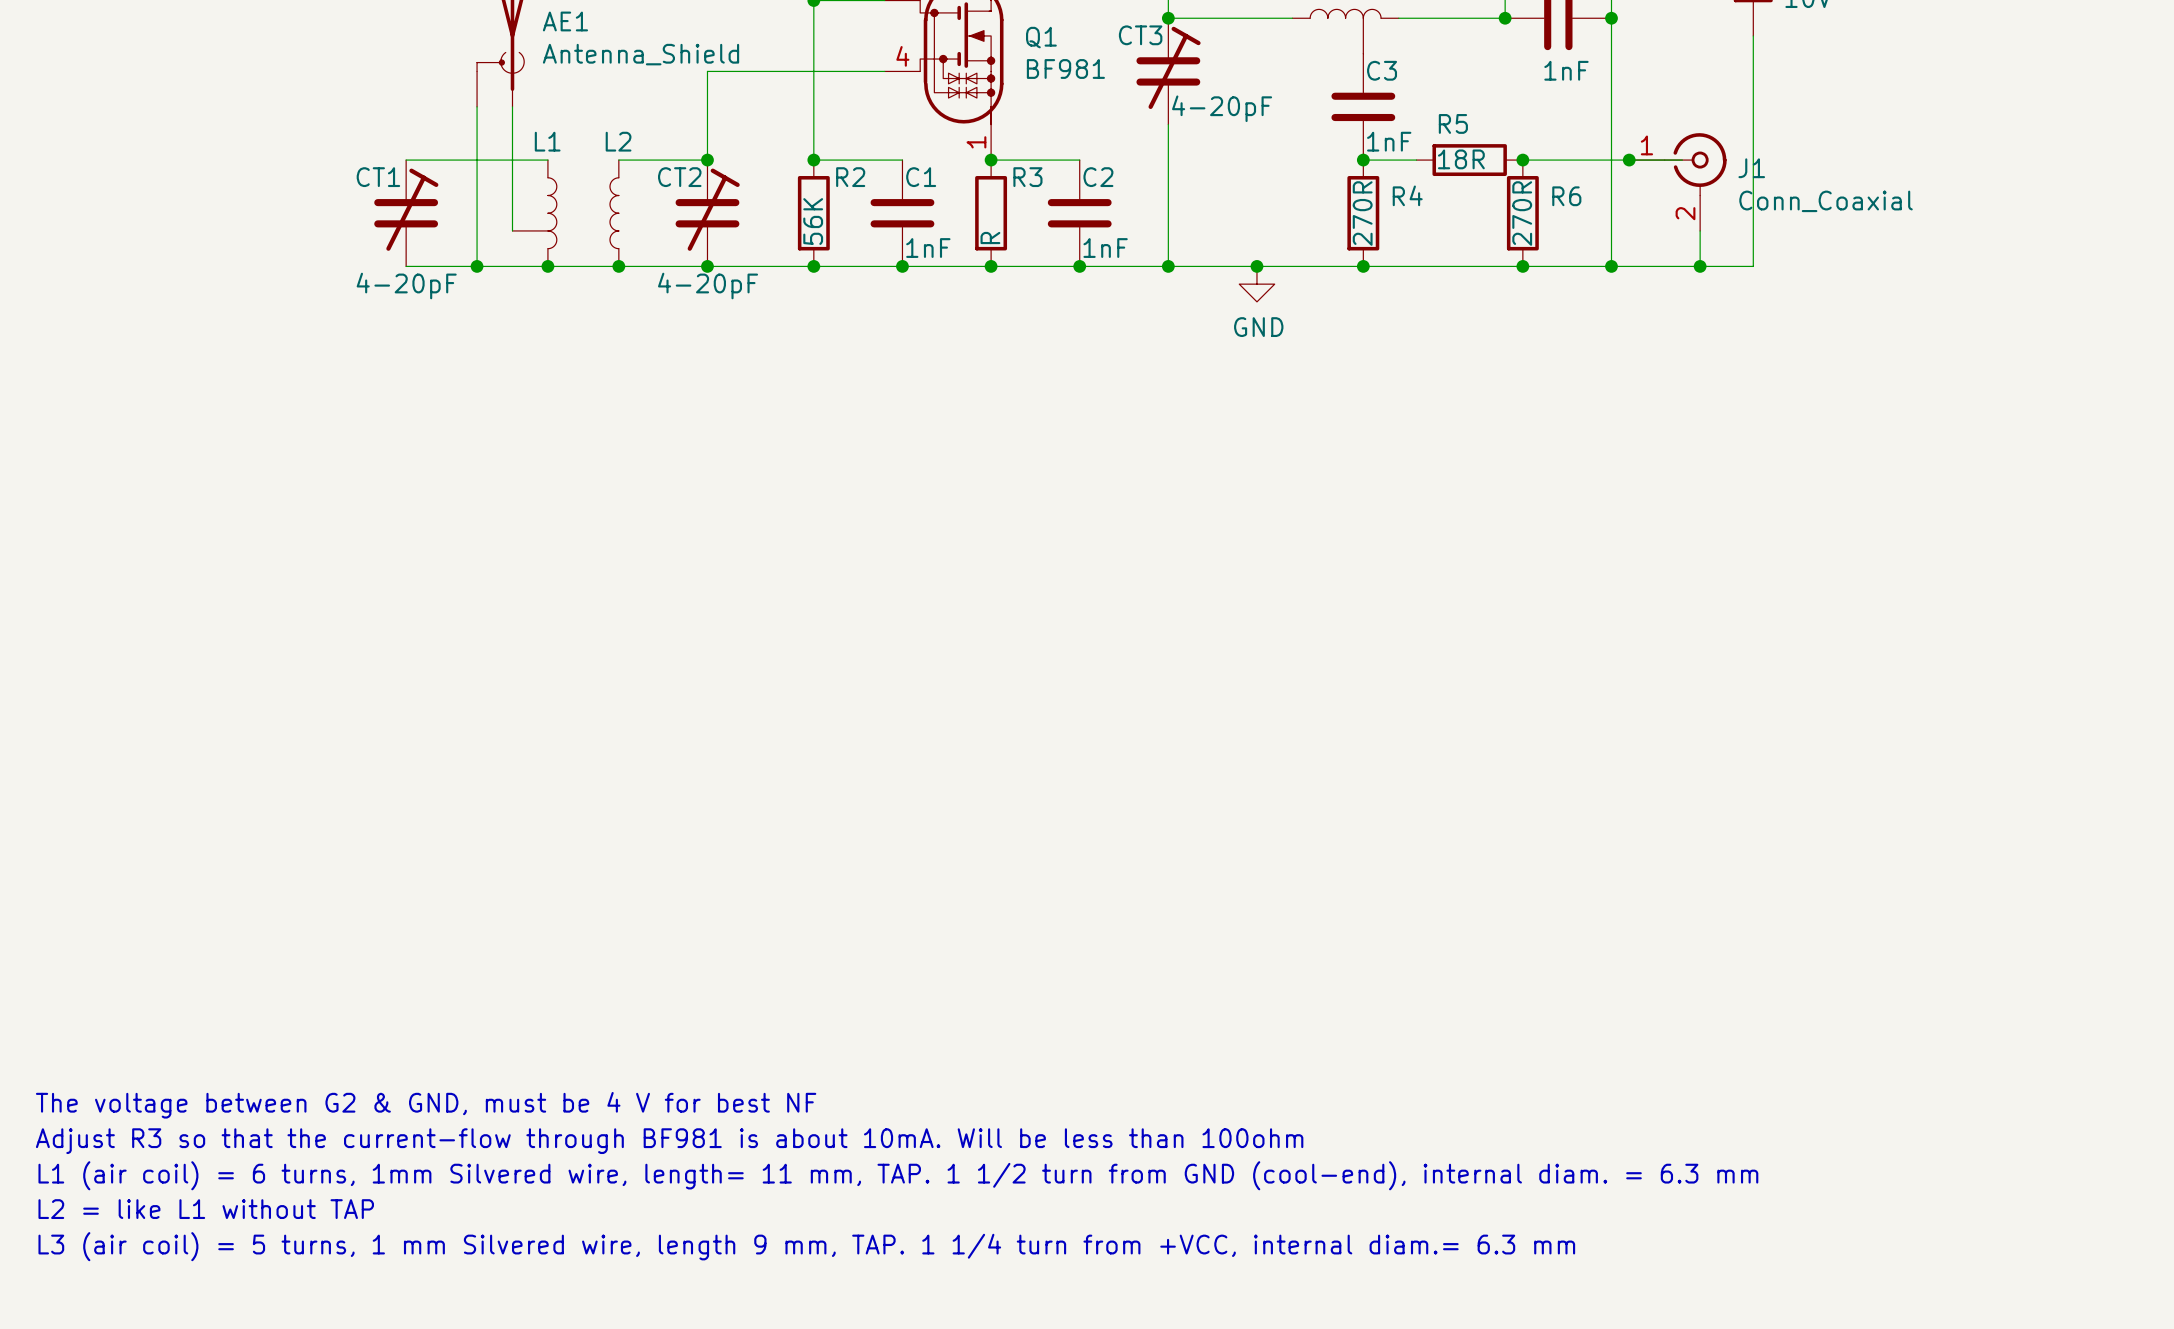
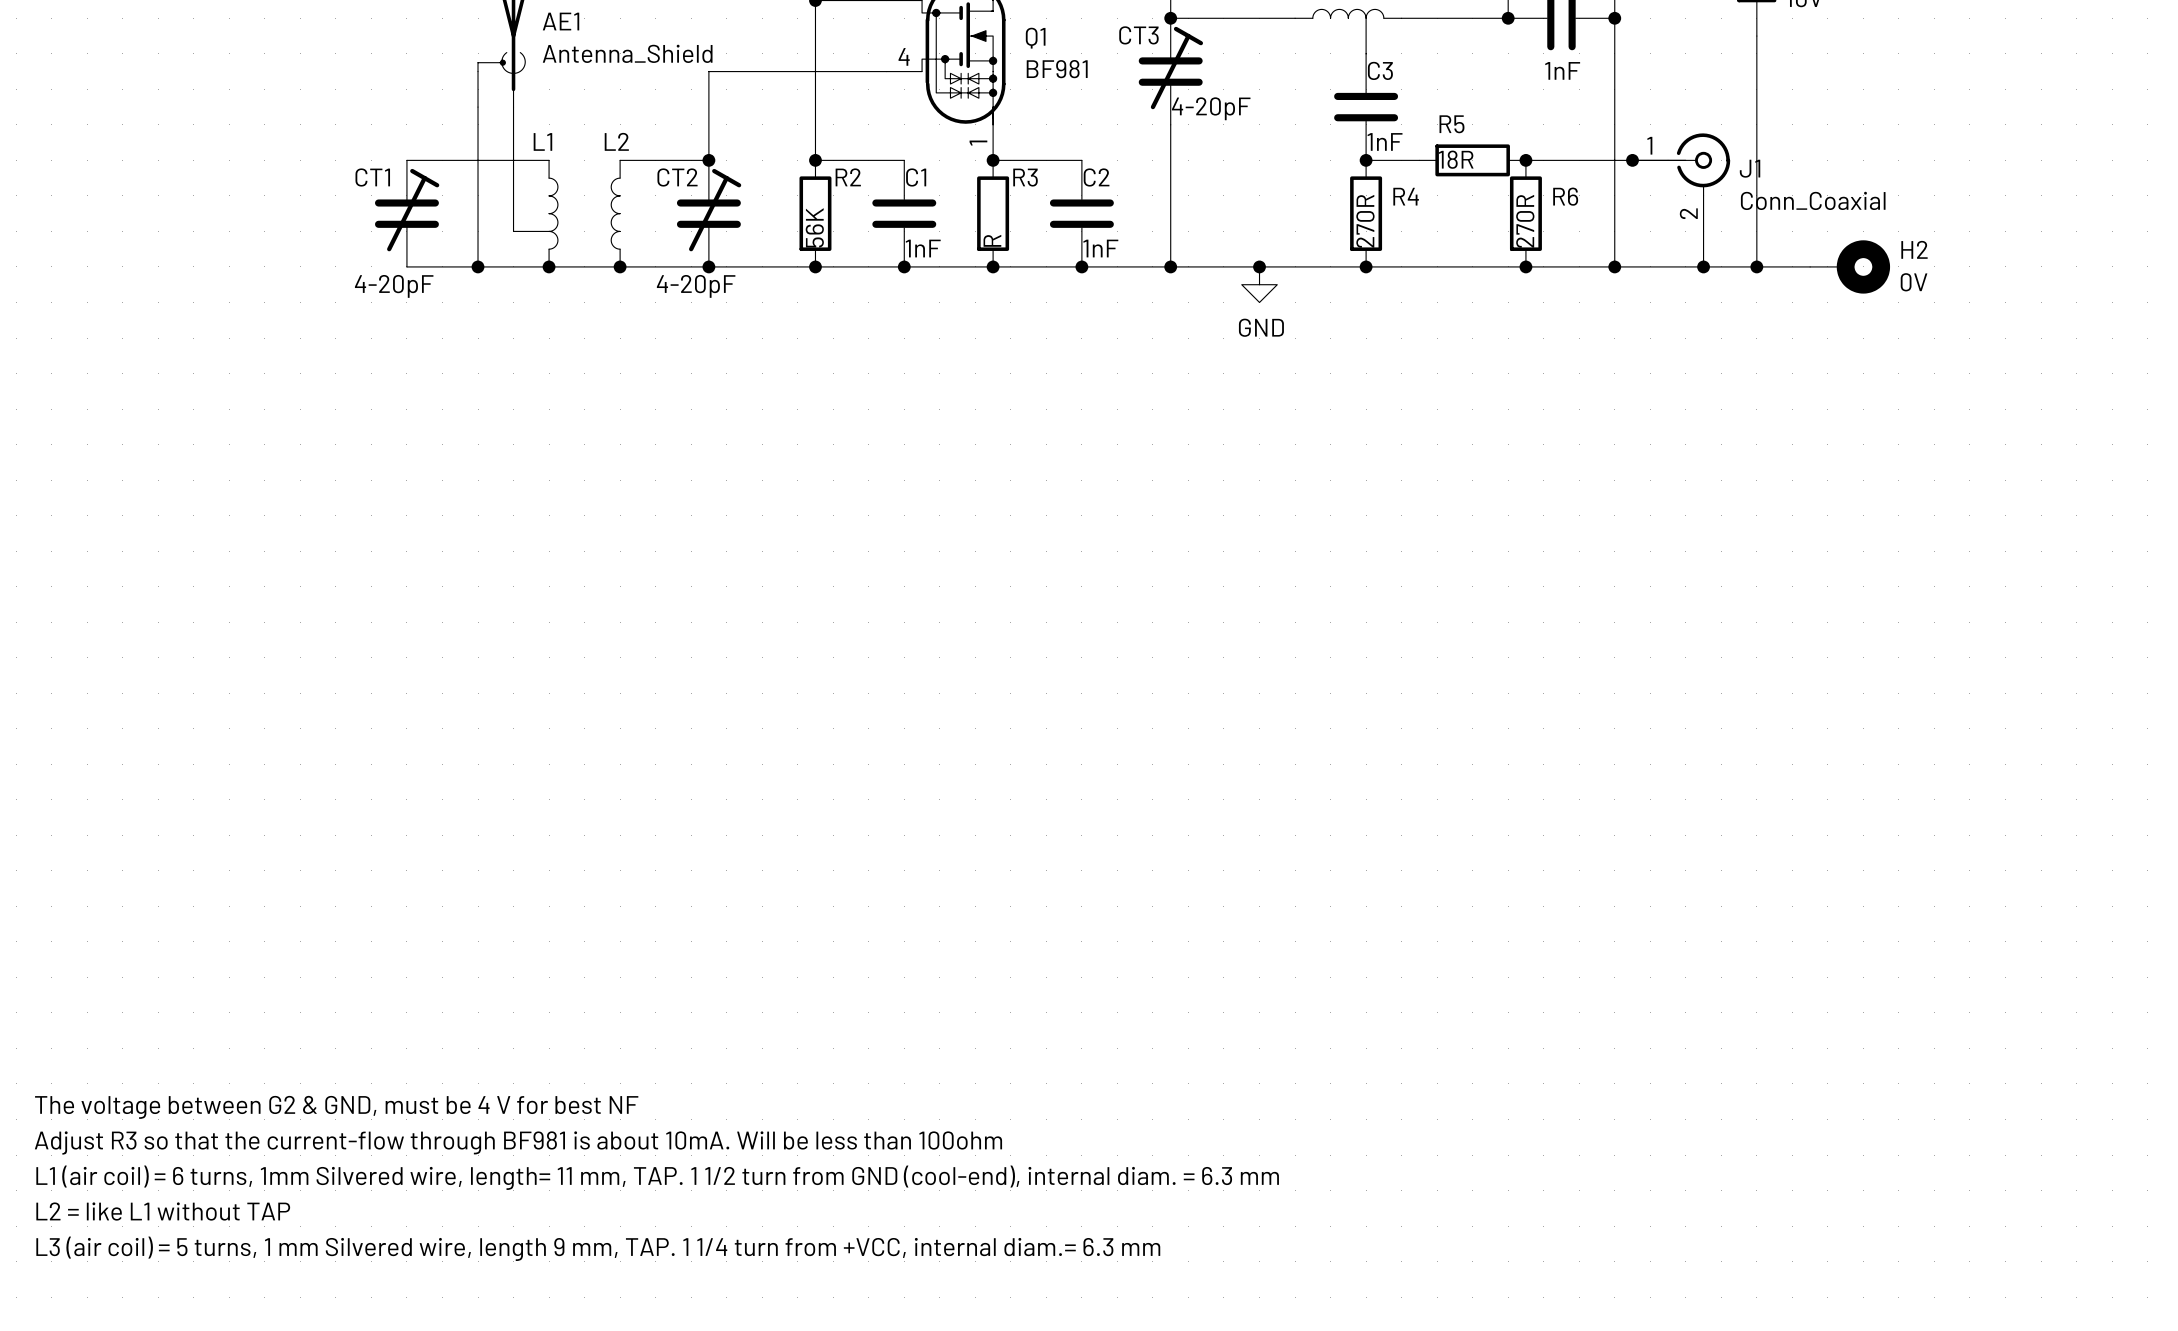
wire: none -> (1756, 266) (1810, 266)
junction: none -> (1756, 266)
H2: none -> 0V (1850, 266)

